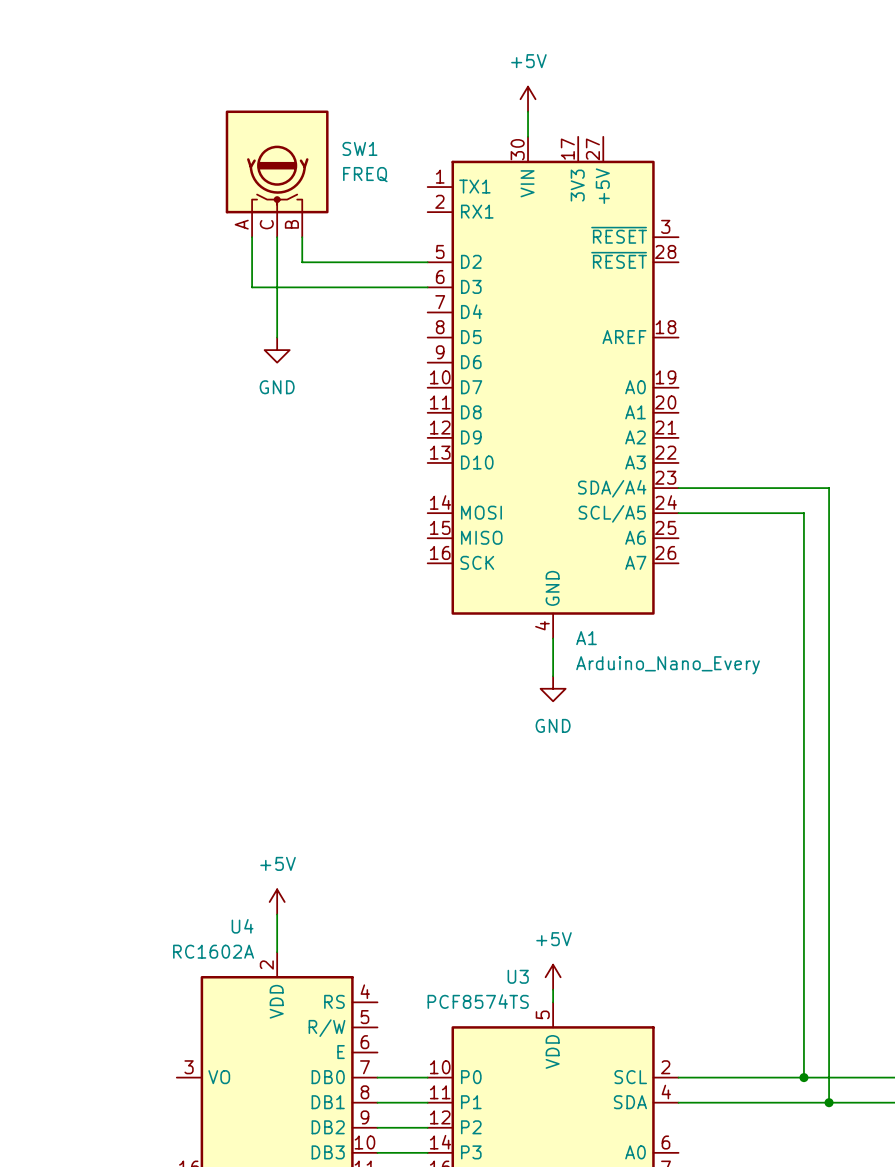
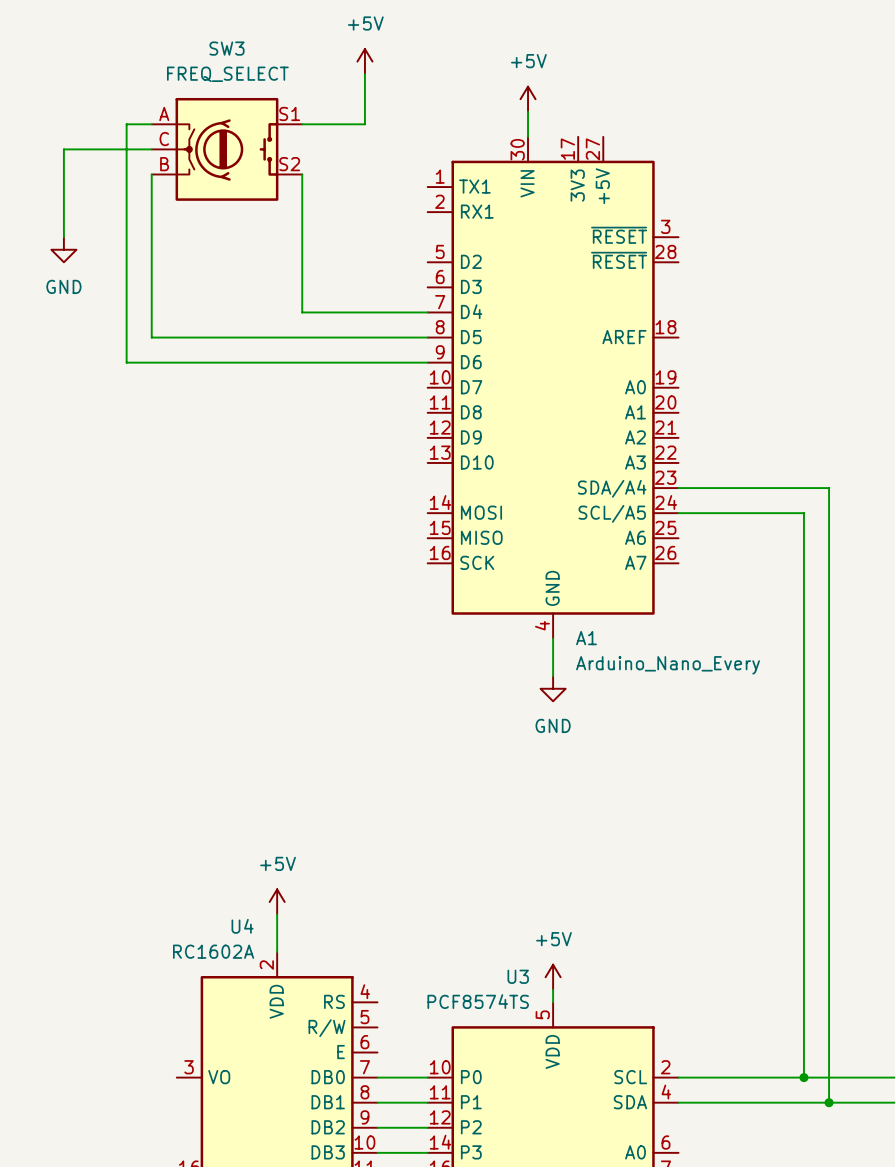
power symbol: none -> +5V (364, 61)
wire: none -> (364, 74) (364, 124) (302, 124)
wire: none -> (151, 124) (126, 124) (126, 362) (427, 362)
wire: none -> (151, 149) (63, 149) (63, 237)
SW3: none -> FREQ_SELECT (226, 149)
SW1: FREQ (277, 173) -> none
wire: none -> (151, 174) (151, 337) (427, 337)
wire: (252, 237) (252, 287) (427, 287) -> none
wire: (277, 237) (277, 337) -> none
wire: (302, 262) (427, 262) -> (302, 262) (302, 312) (427, 312)
power symbol position: GND (277, 350) -> GND (63, 249)

